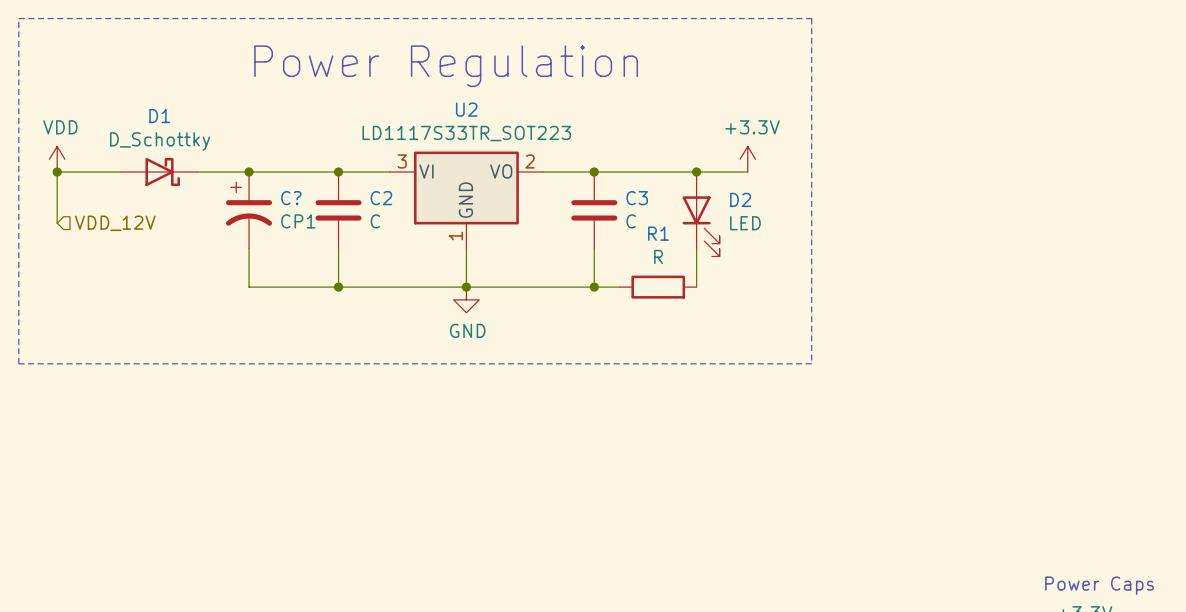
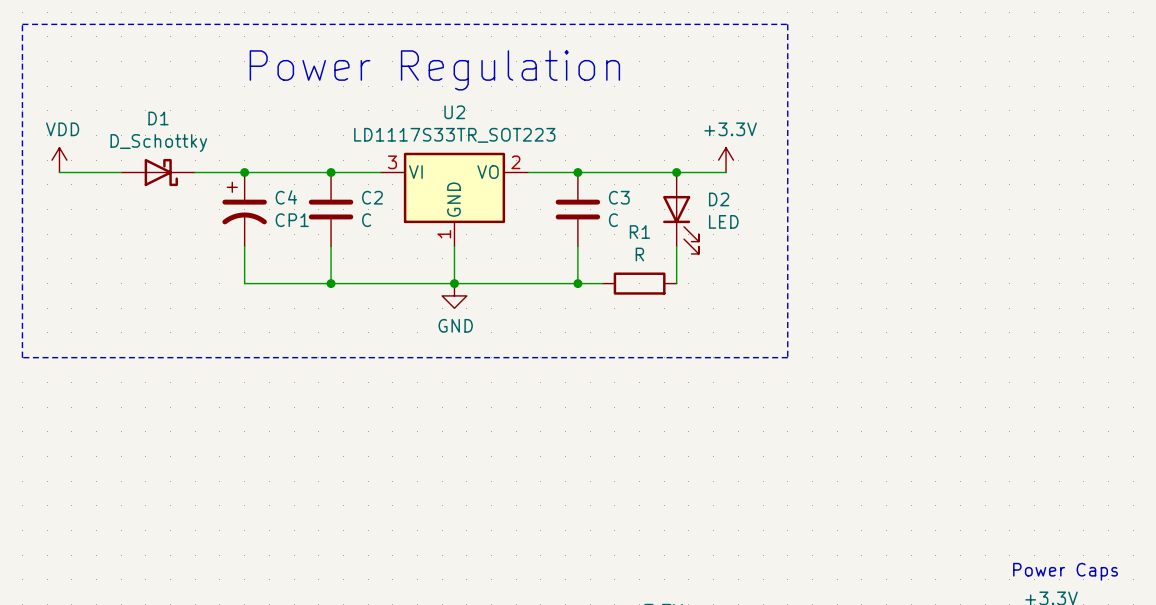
wire: (57, 172) (57, 223) -> none
junction: (57, 172) -> none
C? name: C? (291, 198) -> C4 (286, 197)
hierarchical label: VDD_12V (115, 223) -> none

